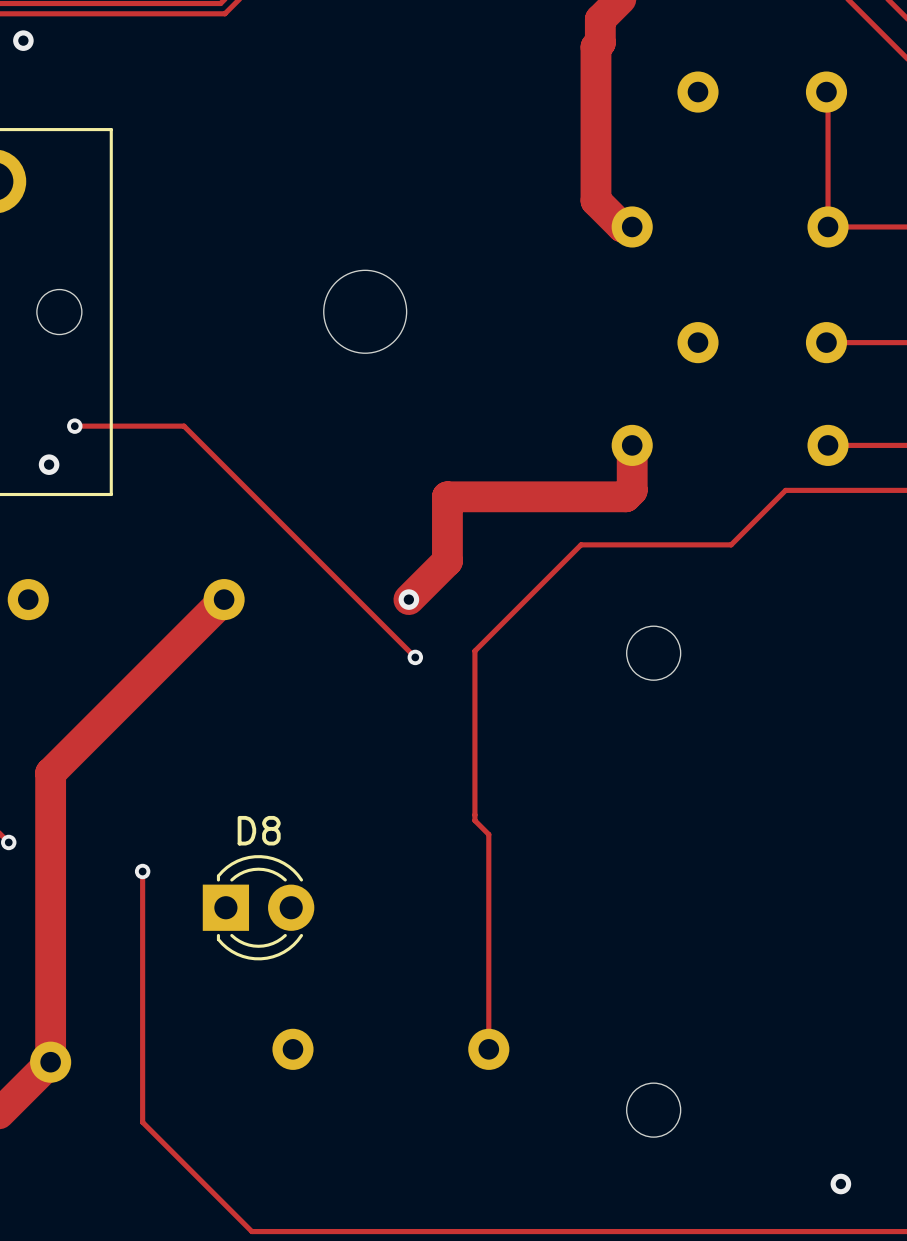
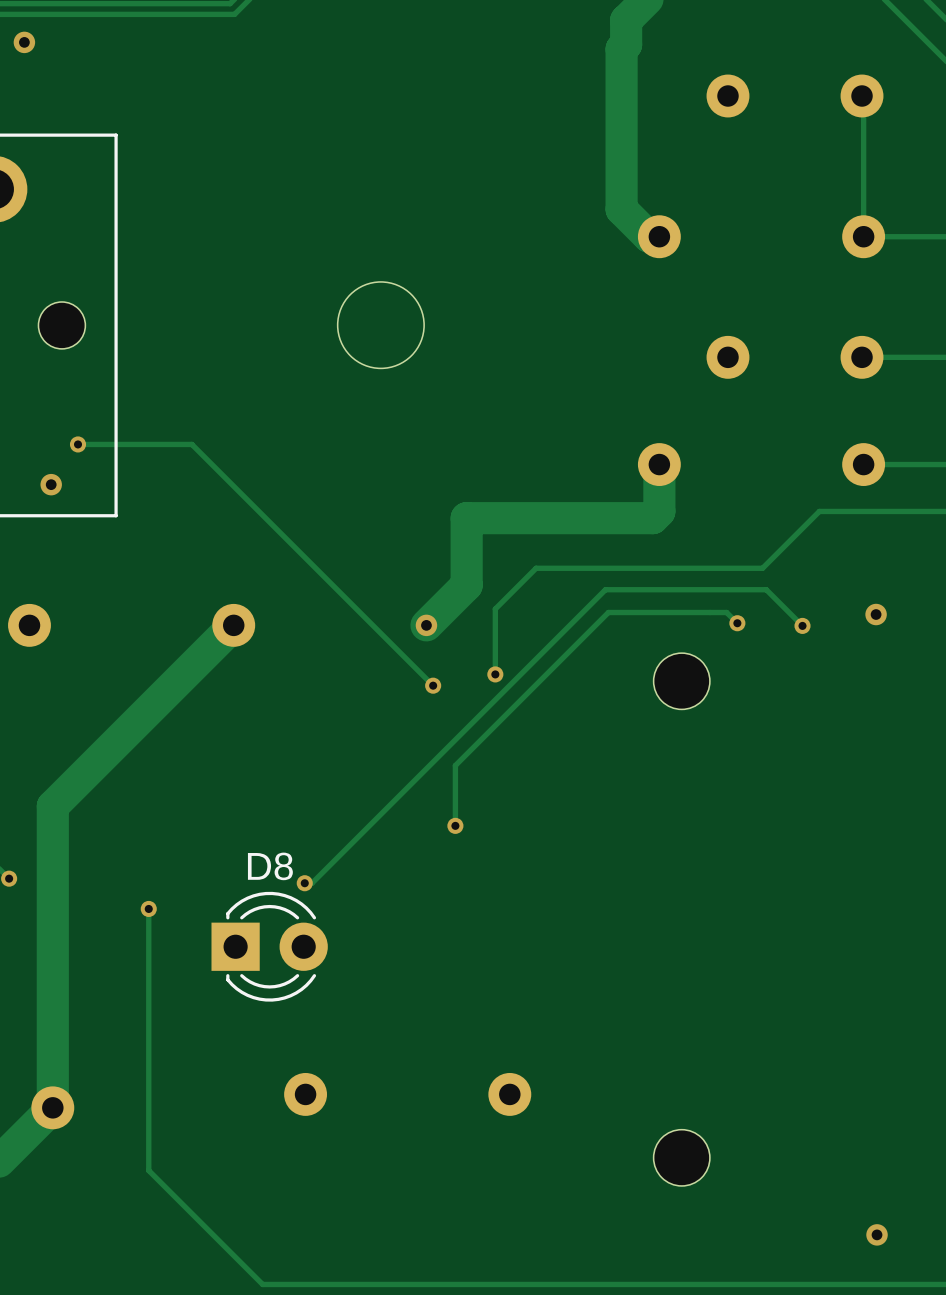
track: (581, 544) (474, 651) (474, 820) (488, 834) (488, 1049) -> (606, 568) (536, 568) (495, 609) (495, 674)
via: none -> (876, 614)
track: none -> (737, 623) (726, 612) (608, 612) (455, 765) (455, 825)
via: none -> (737, 623)
track: none -> (802, 625) (766, 589) (605, 589) (312, 883) (304, 883)
via: none -> (802, 625)
via: none -> (495, 674)
via: none -> (455, 825)
via: none -> (304, 883)

